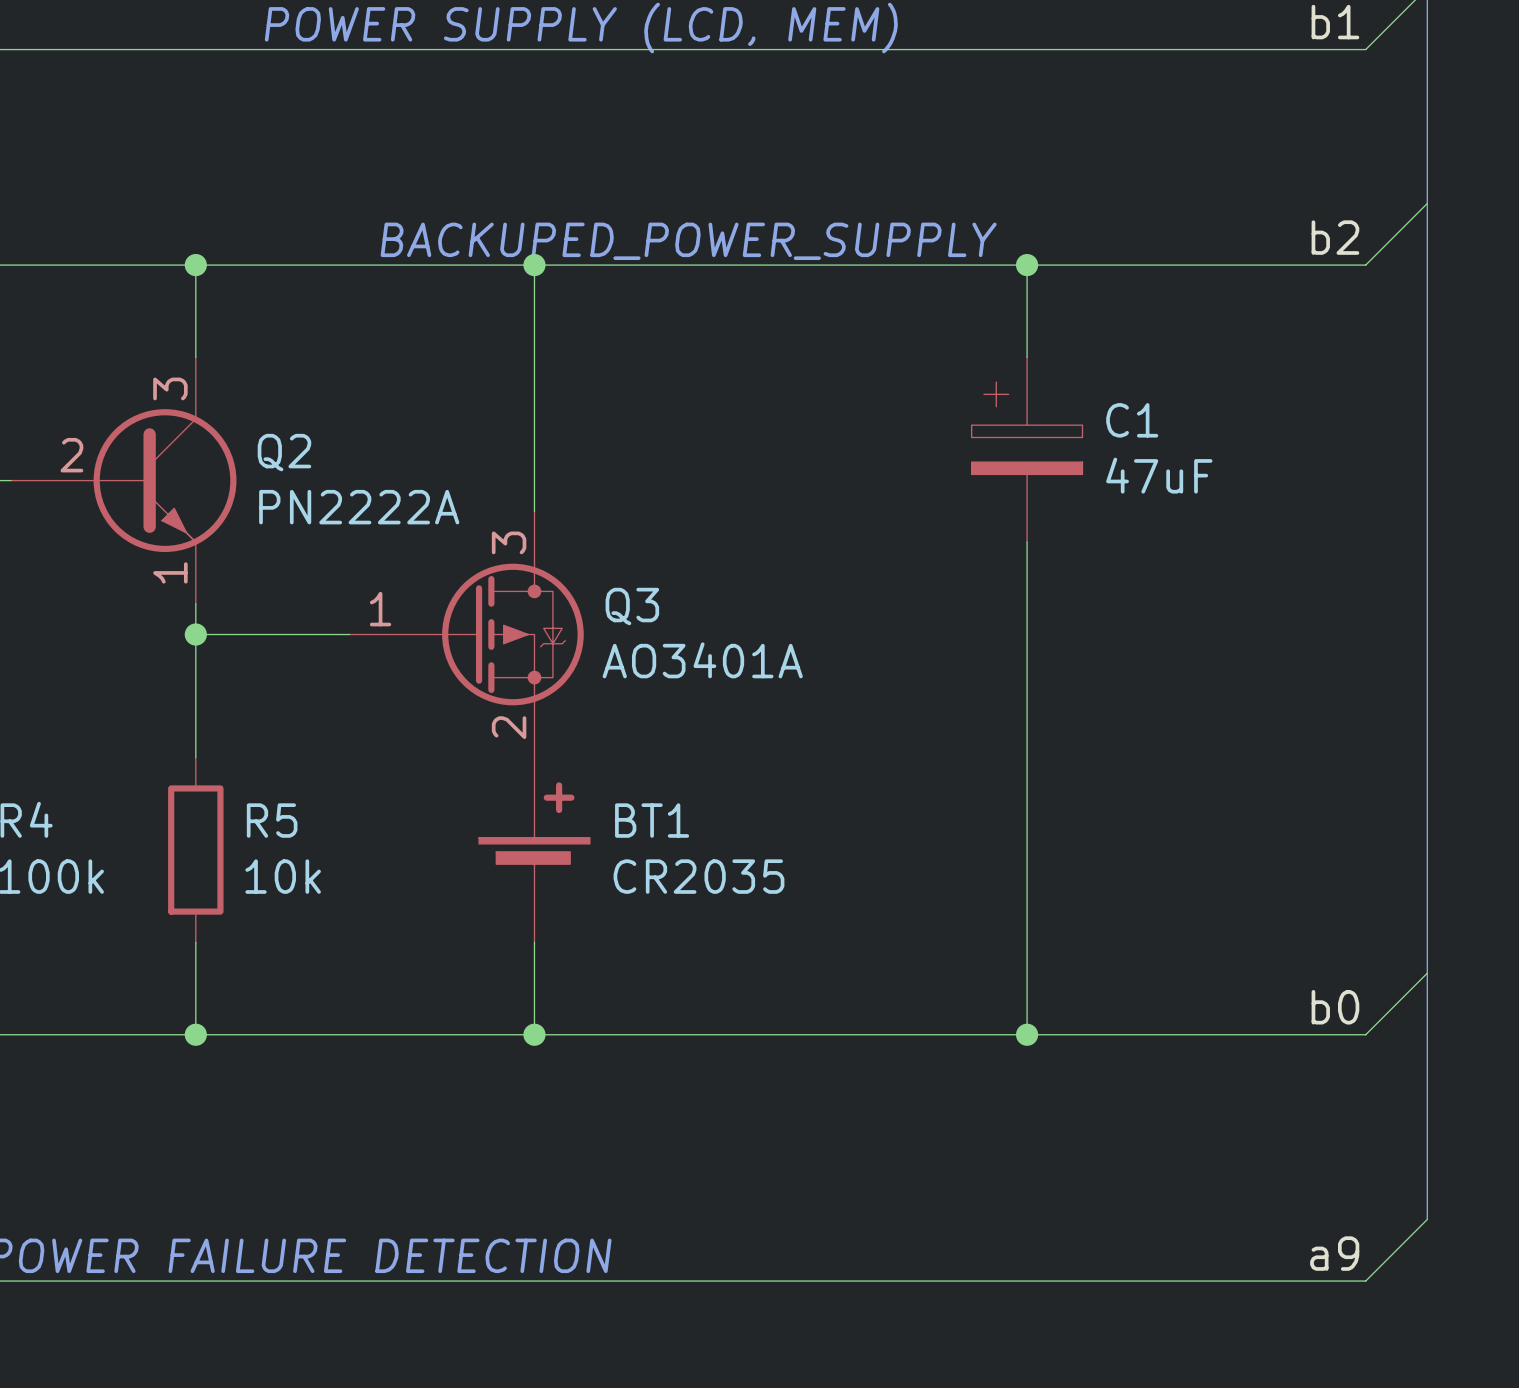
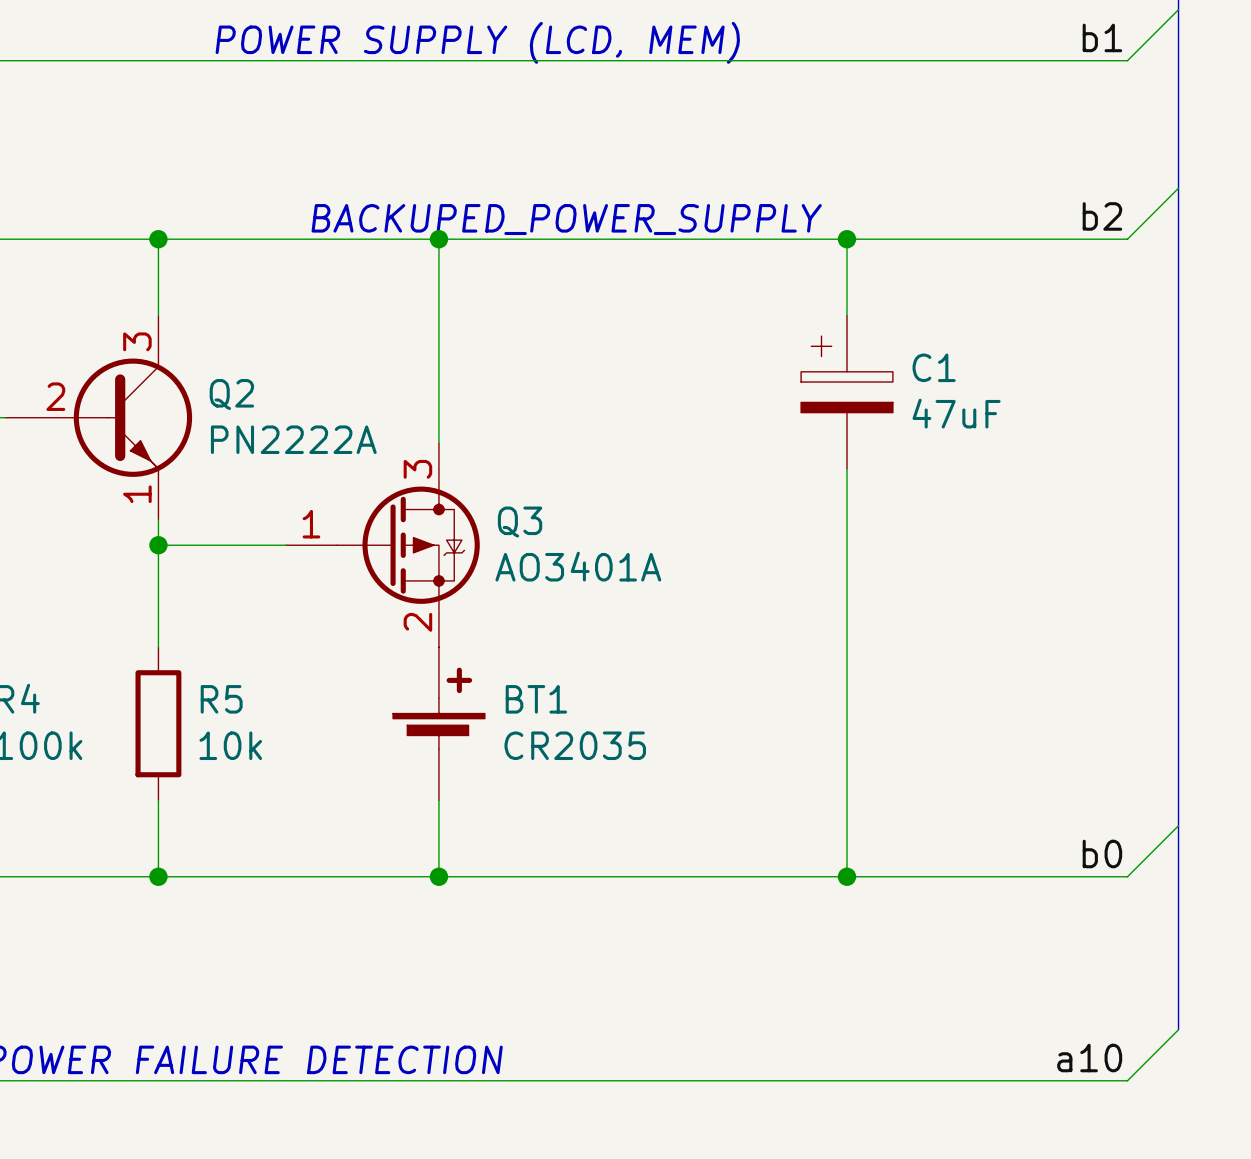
label: a9 (1334, 1253) -> a10 (1089, 1058)

